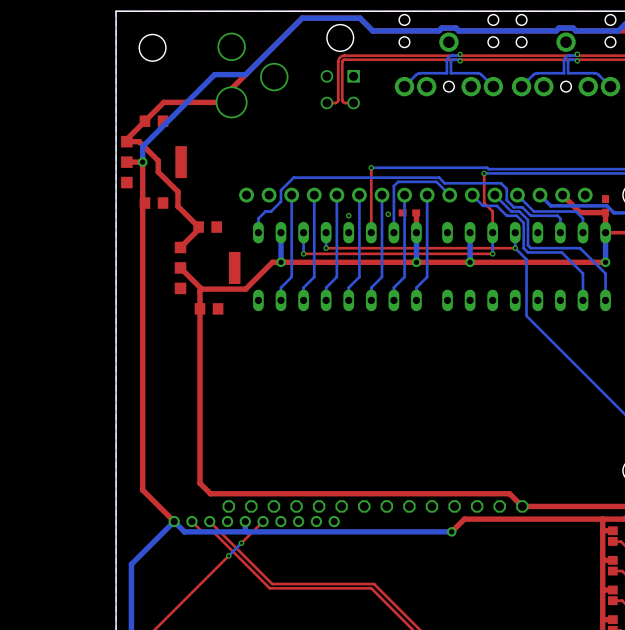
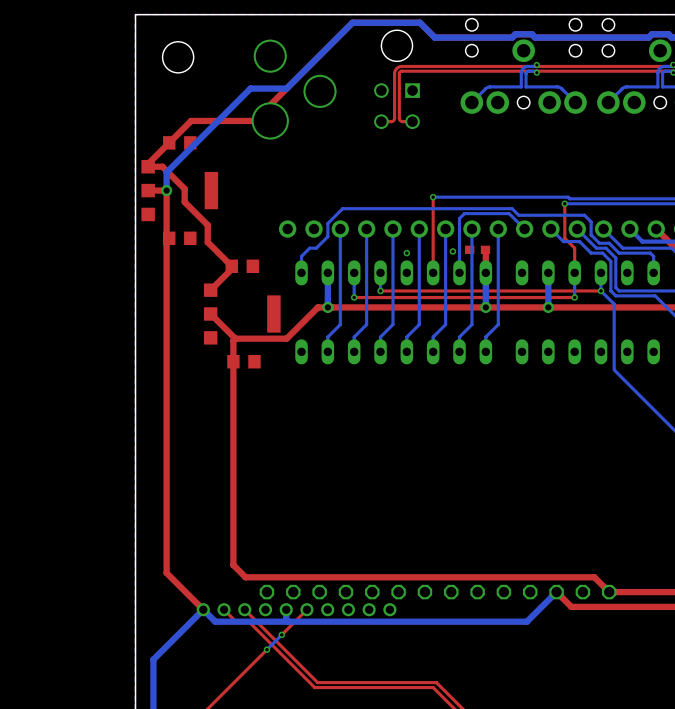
bottom track: none -> (556, 592) (526, 621)
top track: (489, 519) (464, 519) (451, 531) -> (571, 606) (556, 592)
via: (451, 531) -> none

